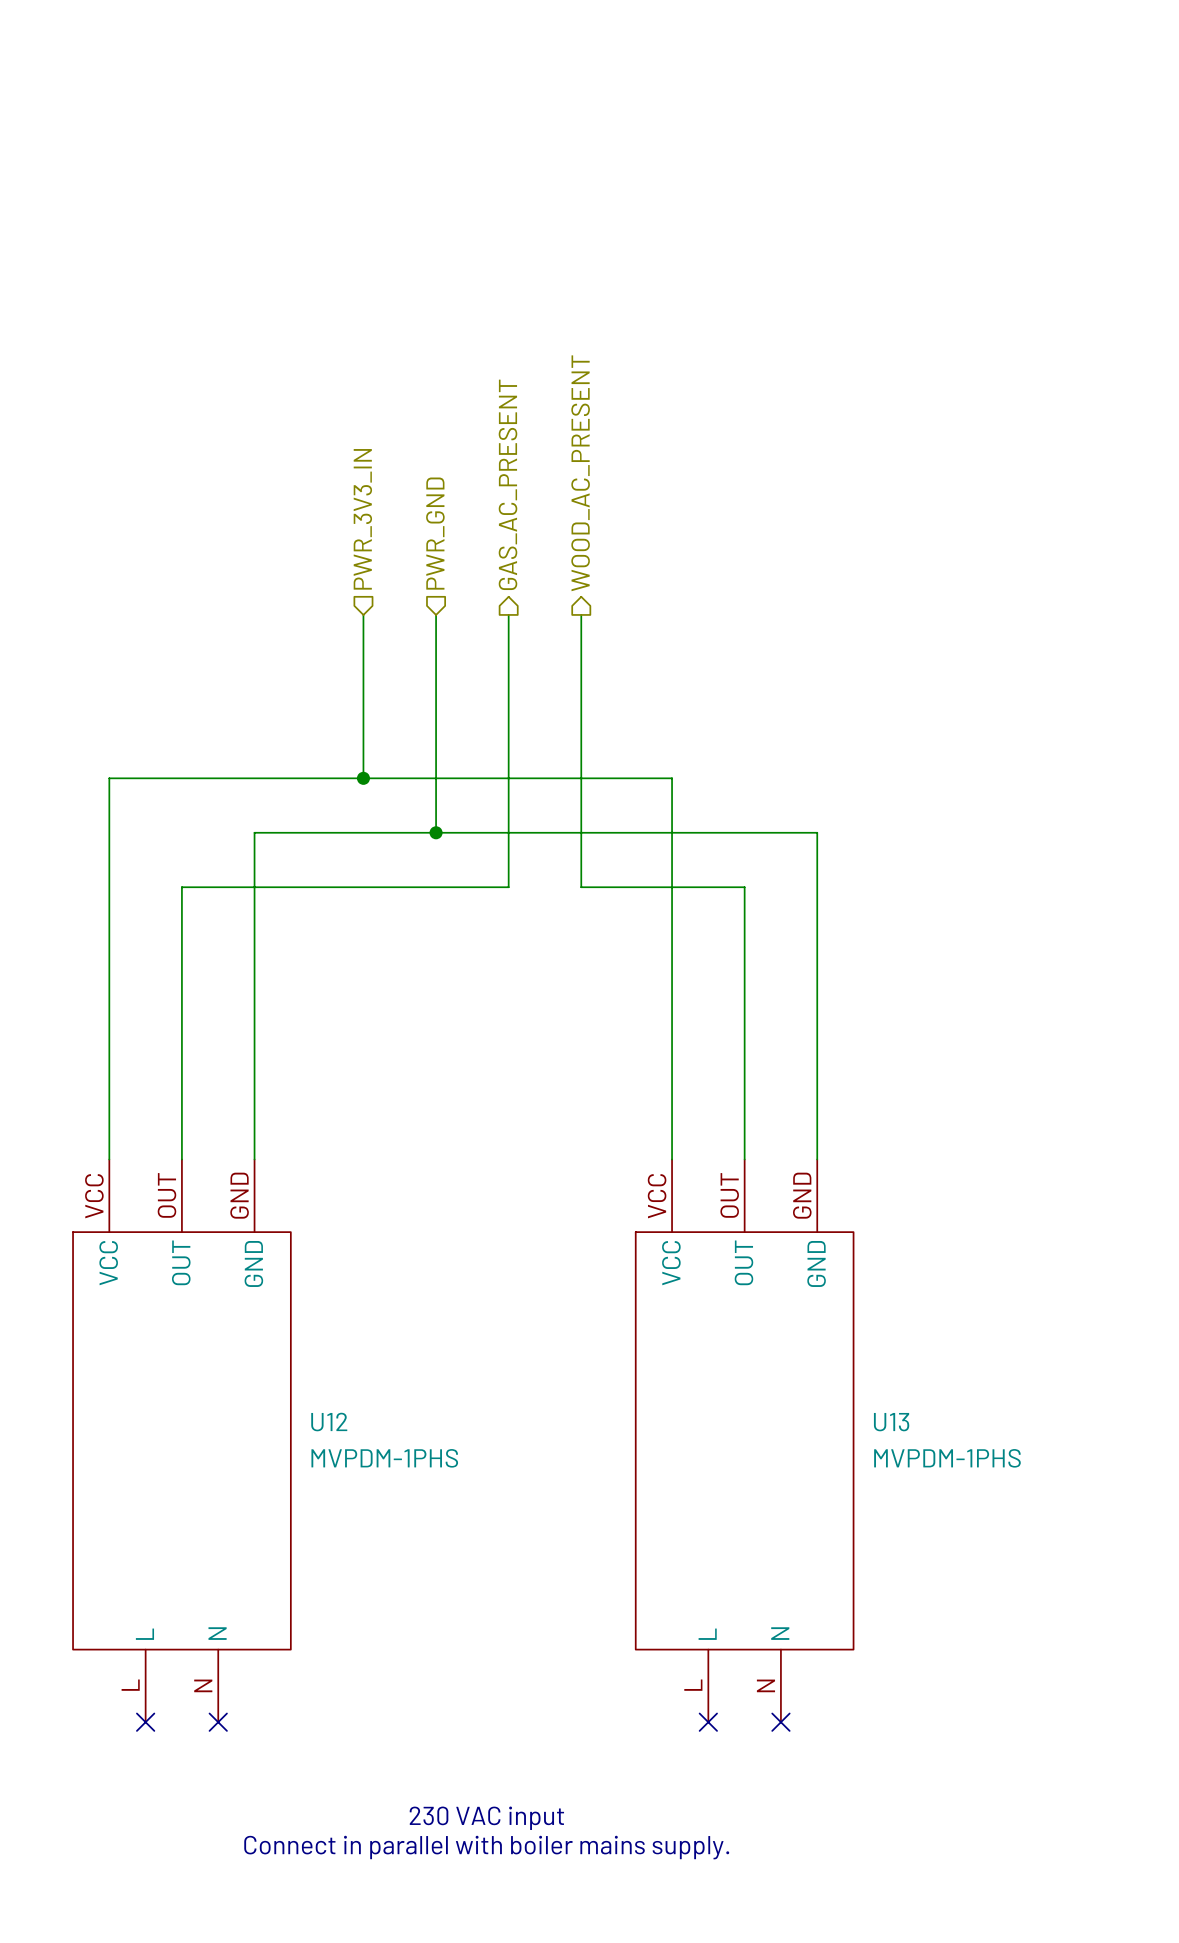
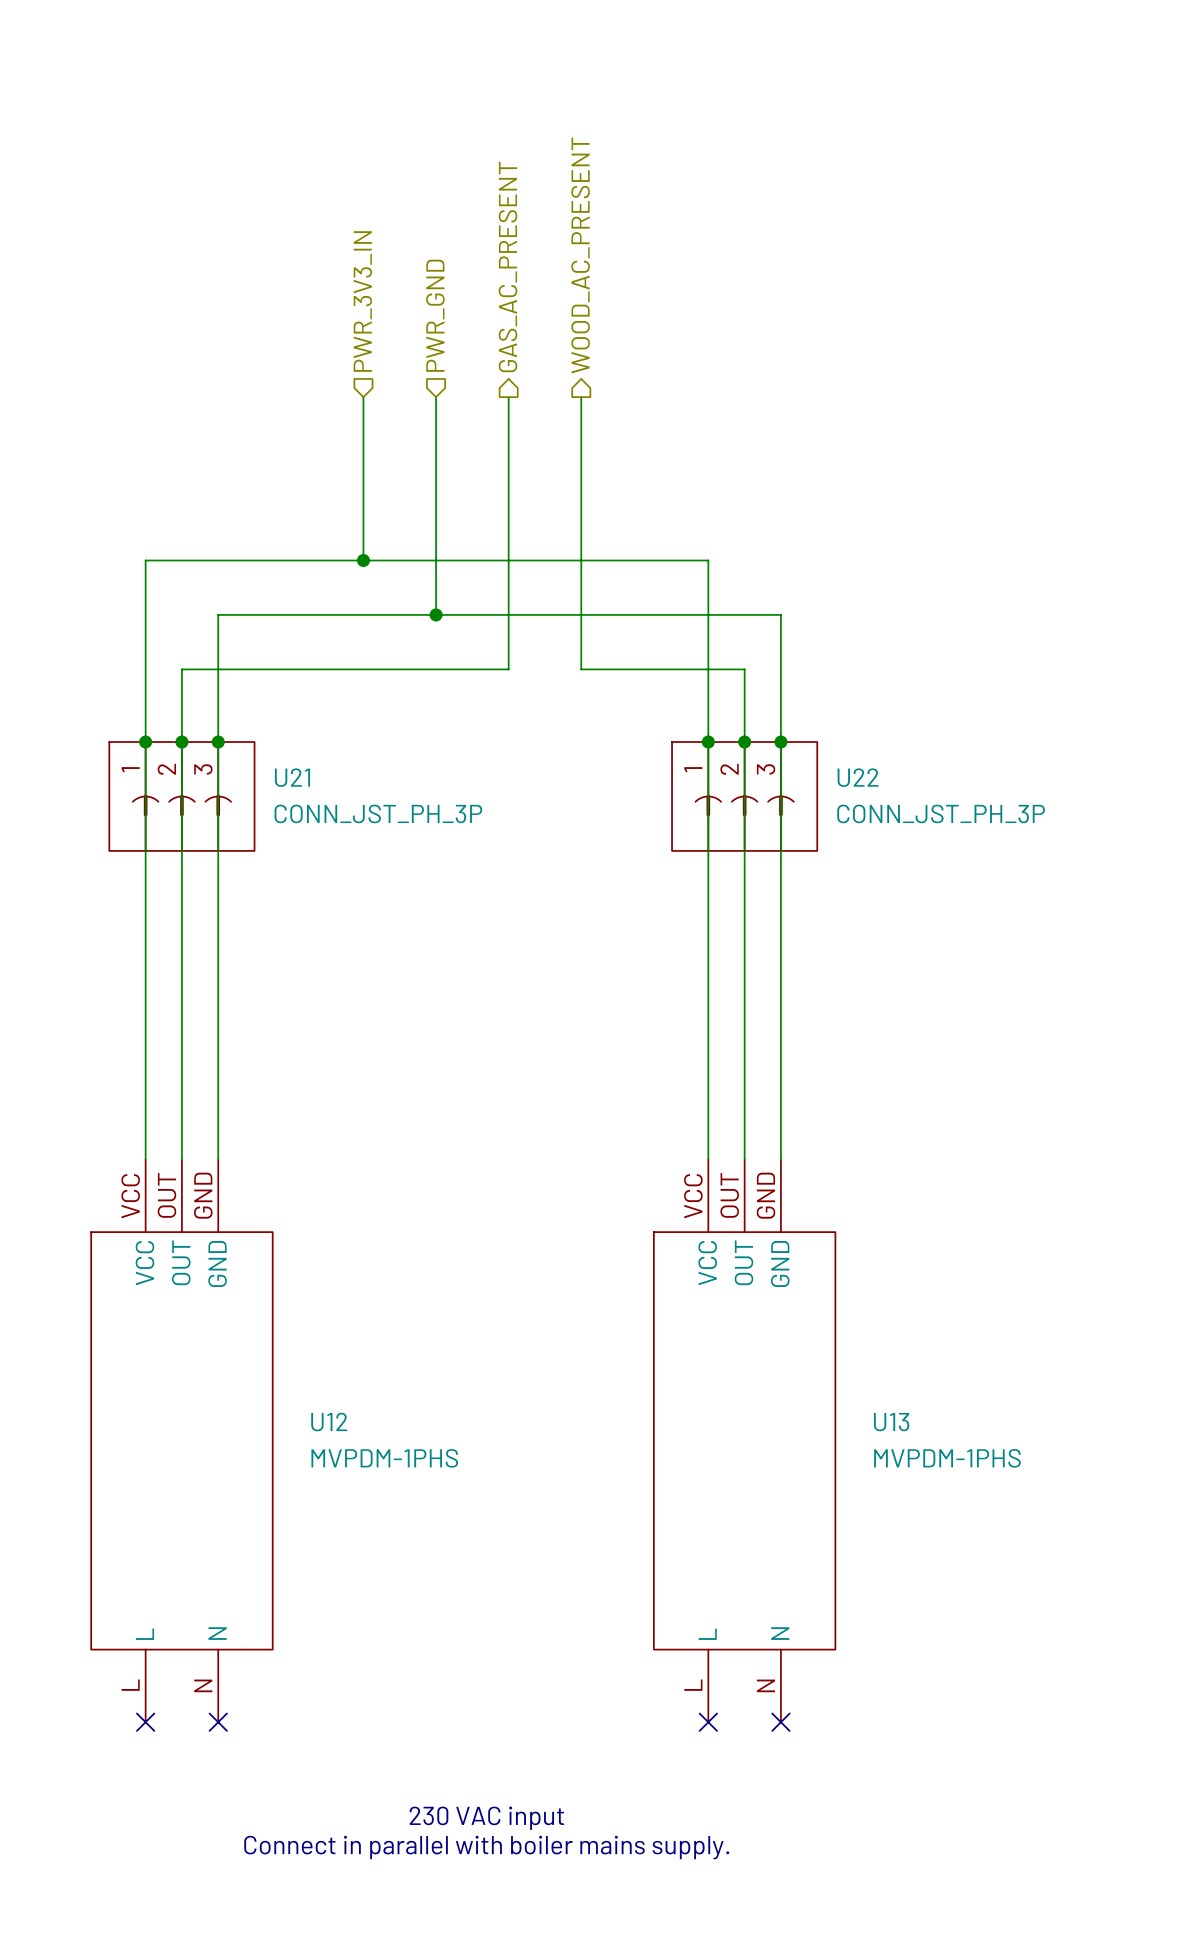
wire: none -> (508, 397) (508, 614)
wire: none -> (581, 397) (581, 614)
hierarchical label position: WOOD_AC_PRESENT (580, 473) -> WOOD_AC_PRESENT (580, 255)
hierarchical label position: GAS_AC_PRESENT (508, 484) -> GAS_AC_PRESENT (508, 267)
hierarchical label position: PWR_3V3_IN (362, 519) -> PWR_3V3_IN (362, 301)
hierarchical label position: PWR_GND (435, 533) -> PWR_GND (435, 315)
junction: none -> (363, 560)
wire: (363, 614) (363, 778) -> (363, 397) (363, 560)
wire: (436, 614) (436, 832) -> (436, 614) (436, 397)
junction: none -> (436, 614)
wire: (508, 669) (508, 887) (181, 887) -> (508, 669) (181, 669) (181, 887)
wire: (581, 669) (581, 887) (744, 887) -> (581, 669) (744, 669) (744, 887)
junction: none -> (145, 742)
junction: none -> (181, 742)
junction: none -> (218, 742)
junction: none -> (708, 742)
junction: none -> (744, 742)
junction: none -> (780, 742)
junction: (363, 778) -> none
U21: none -> CONN_JST_PH_3P (181, 796)
U22: none -> CONN_JST_PH_3P (744, 796)
junction: (436, 832) -> none
U12 symbol: [73, 1159, 291, 1723] -> [91, 1159, 273, 1723]
wire: (109, 1159) (109, 778) (672, 778) (672, 1159) -> none
wire: none -> (145, 1159) (145, 560) (708, 560) (708, 1159)
wire: none -> (218, 1159) (218, 614) (780, 614) (780, 1159)
wire: (254, 1159) (254, 832) (817, 832) (817, 1159) -> none
U13 symbol: [635, 1159, 854, 1723] -> [653, 1159, 836, 1723]

